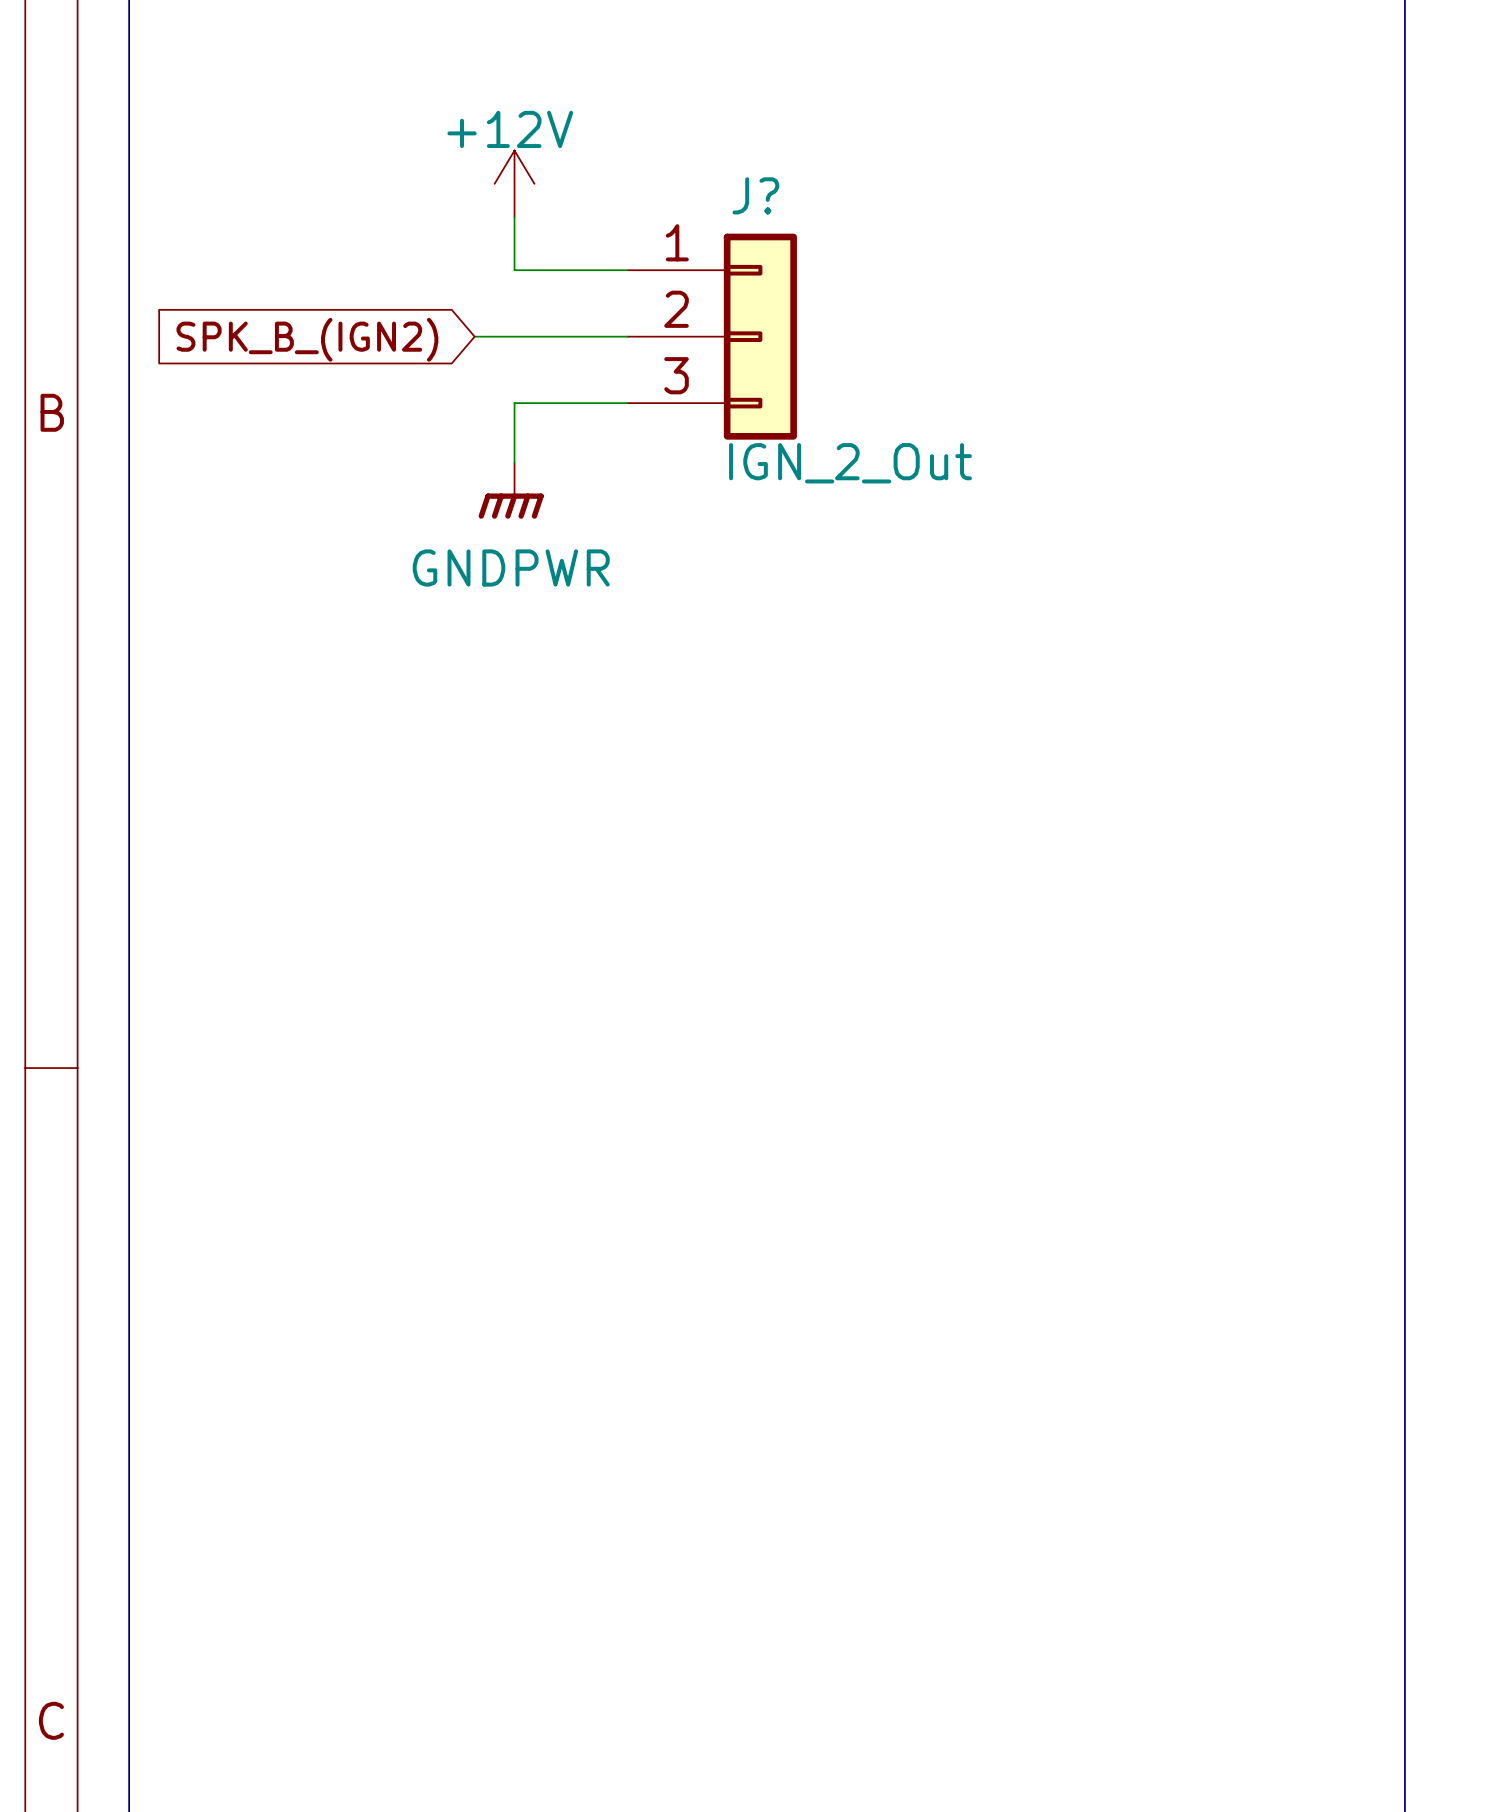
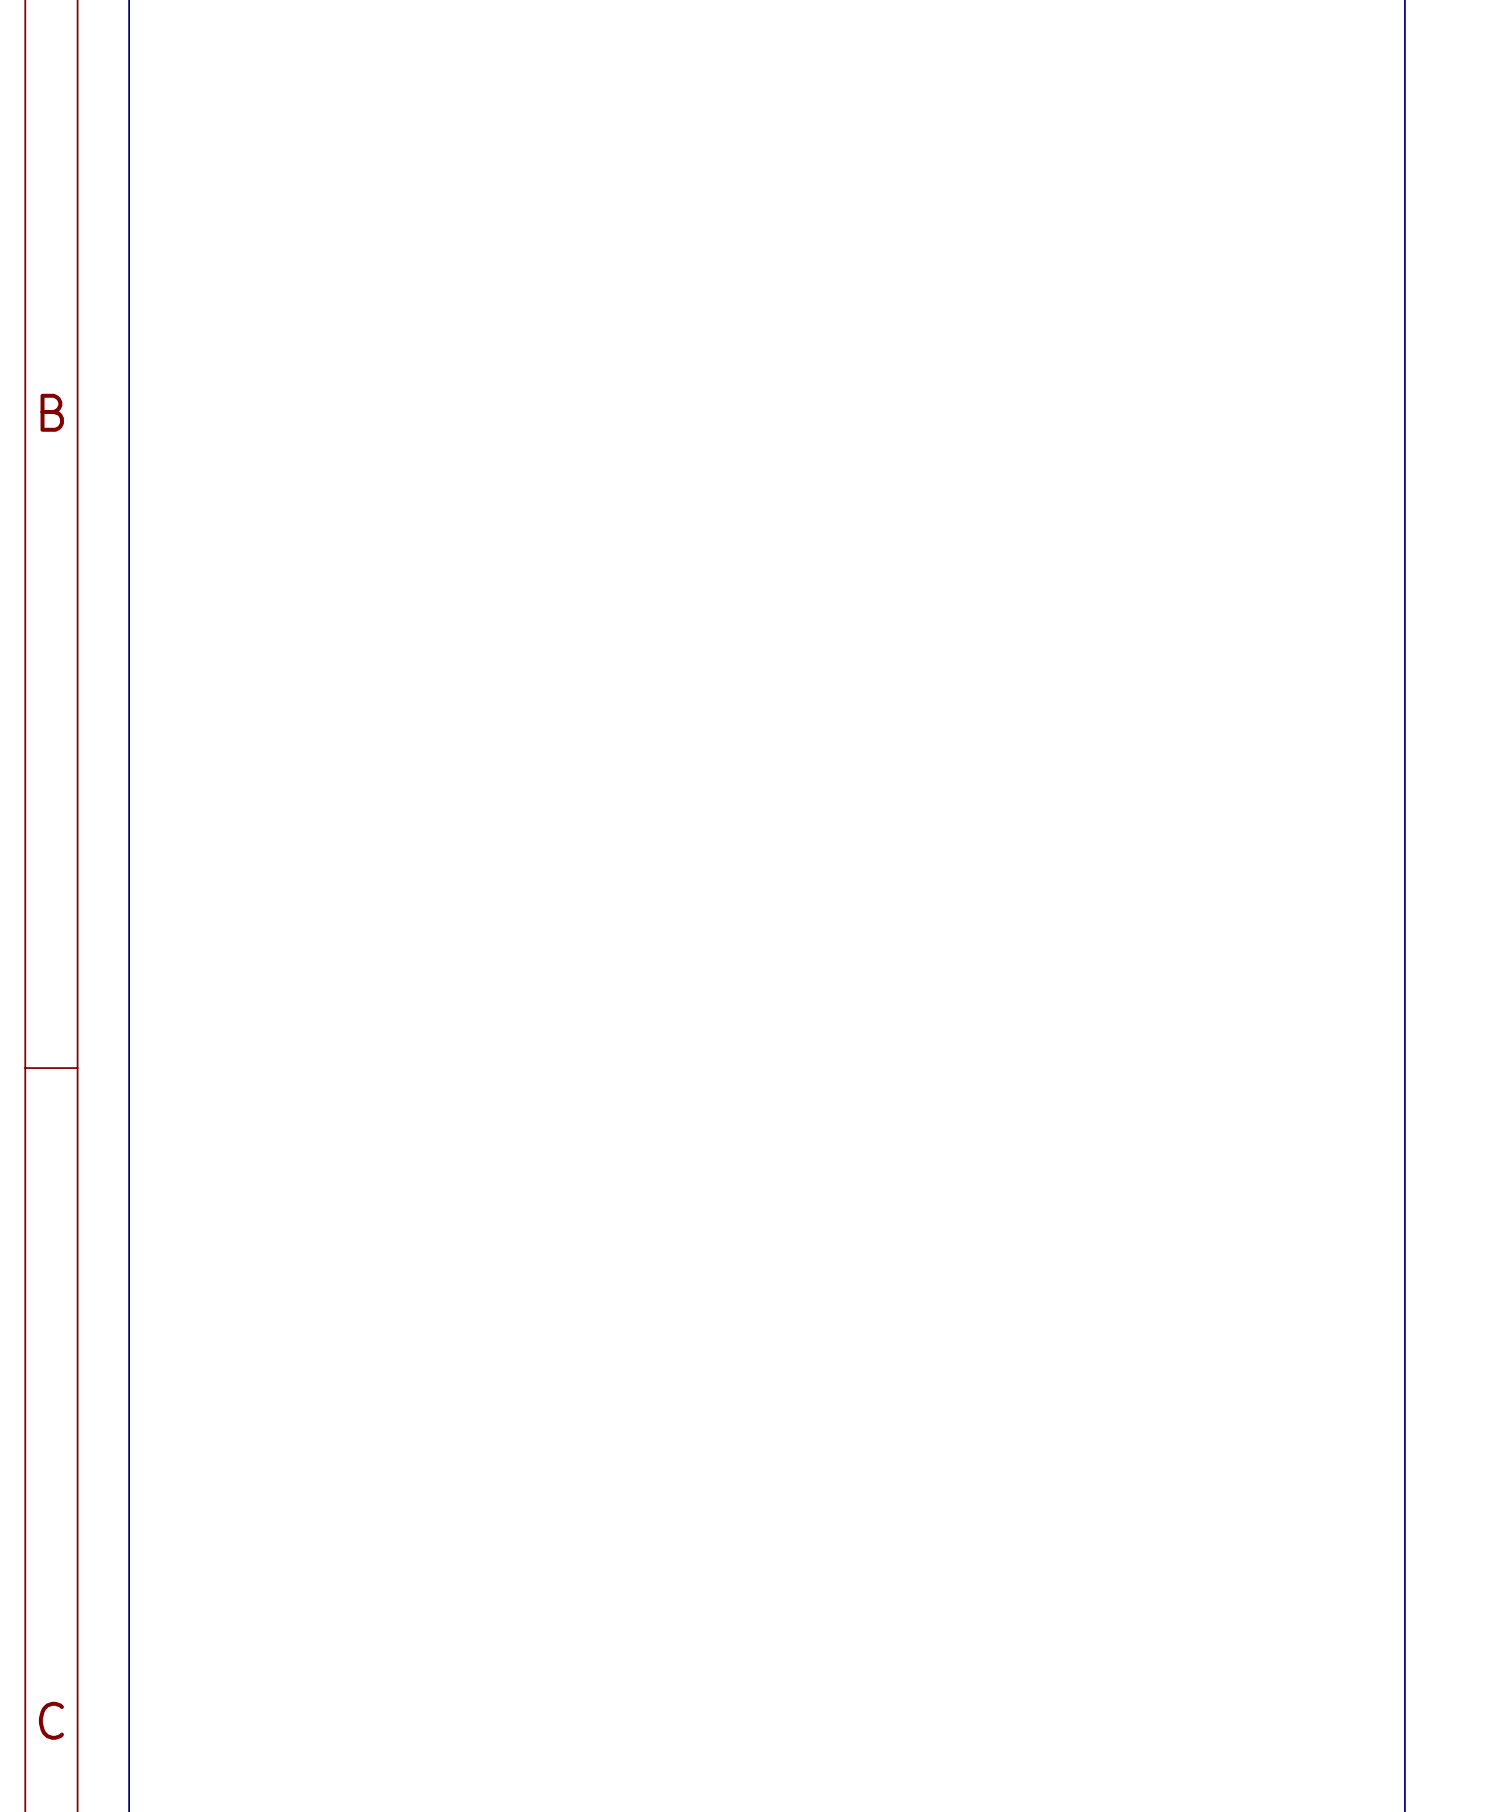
power symbol: +12V (514, 183) -> none
wire: (514, 217) (514, 270) (627, 270) -> none
wire: (474, 336) (627, 336) -> none
J?: IGN_2_Out (712, 336) -> none
global label: SPK_B_(IGN2) (307, 339) -> none
wire: (627, 403) (514, 403) (514, 462) -> none
power symbol: GNDPWR (511, 490) -> none

